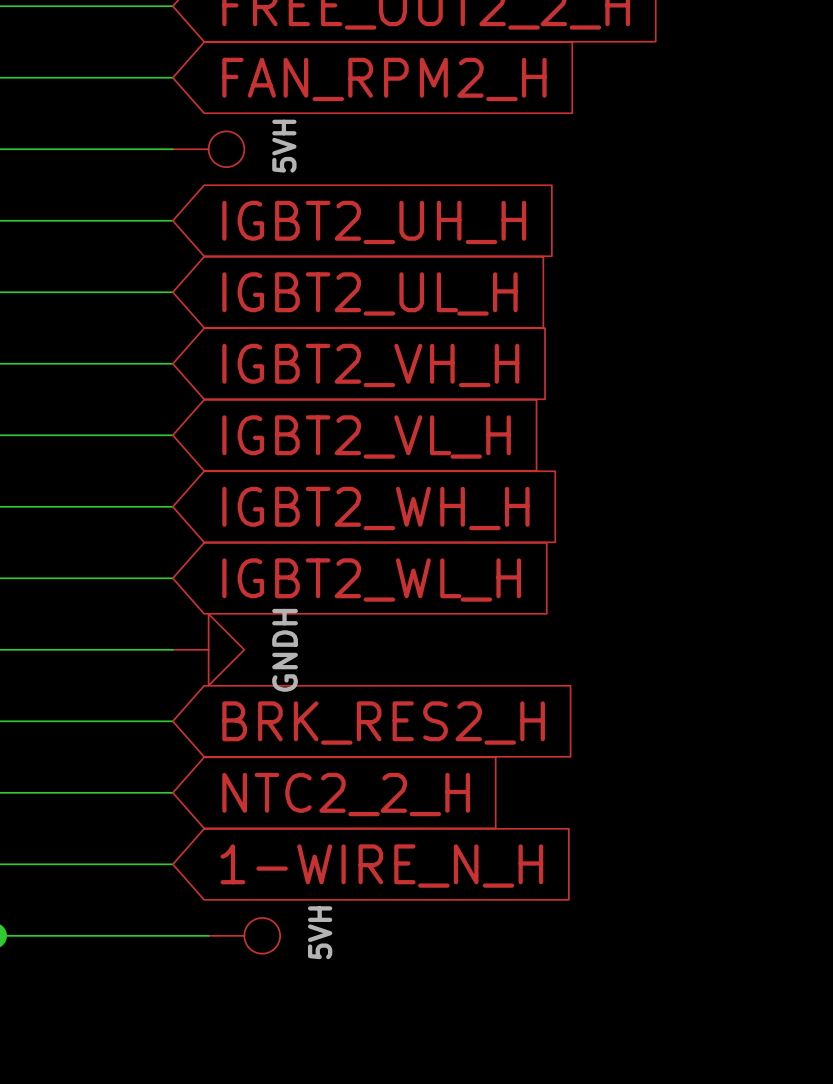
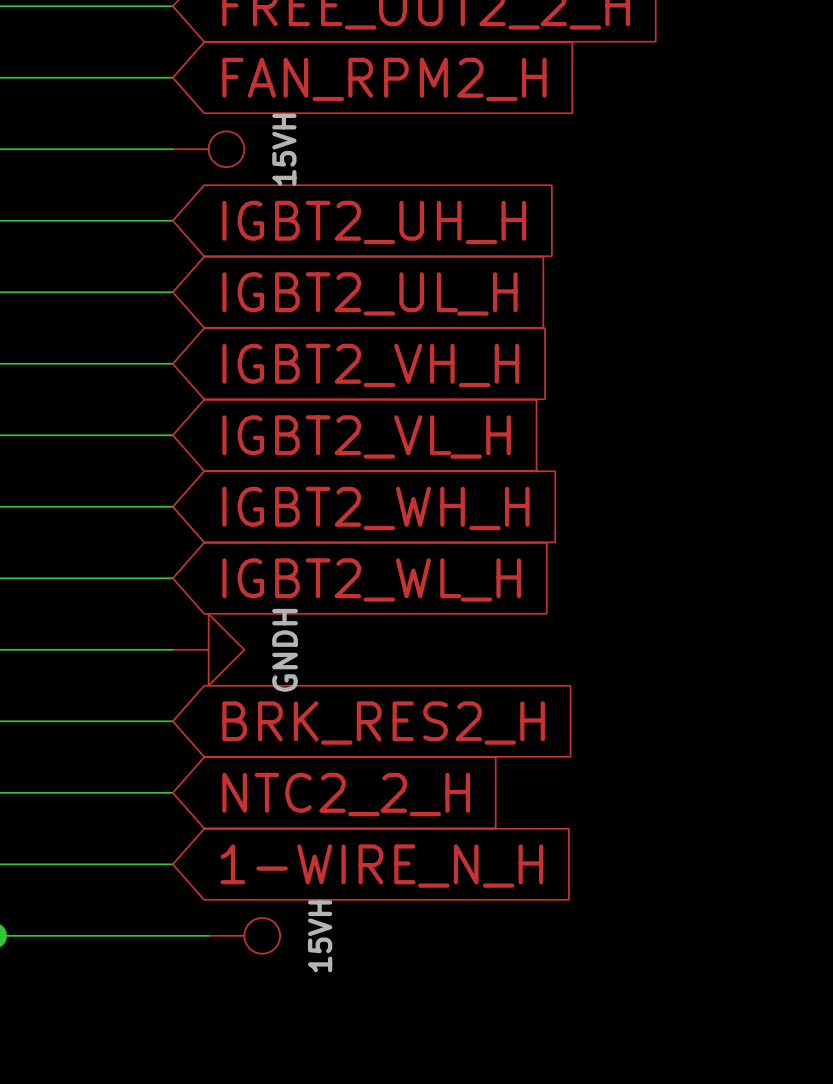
power symbol: 5VH (208, 149) -> 15VH (208, 149)
power symbol: 5VH (244, 935) -> 15VH (244, 935)

